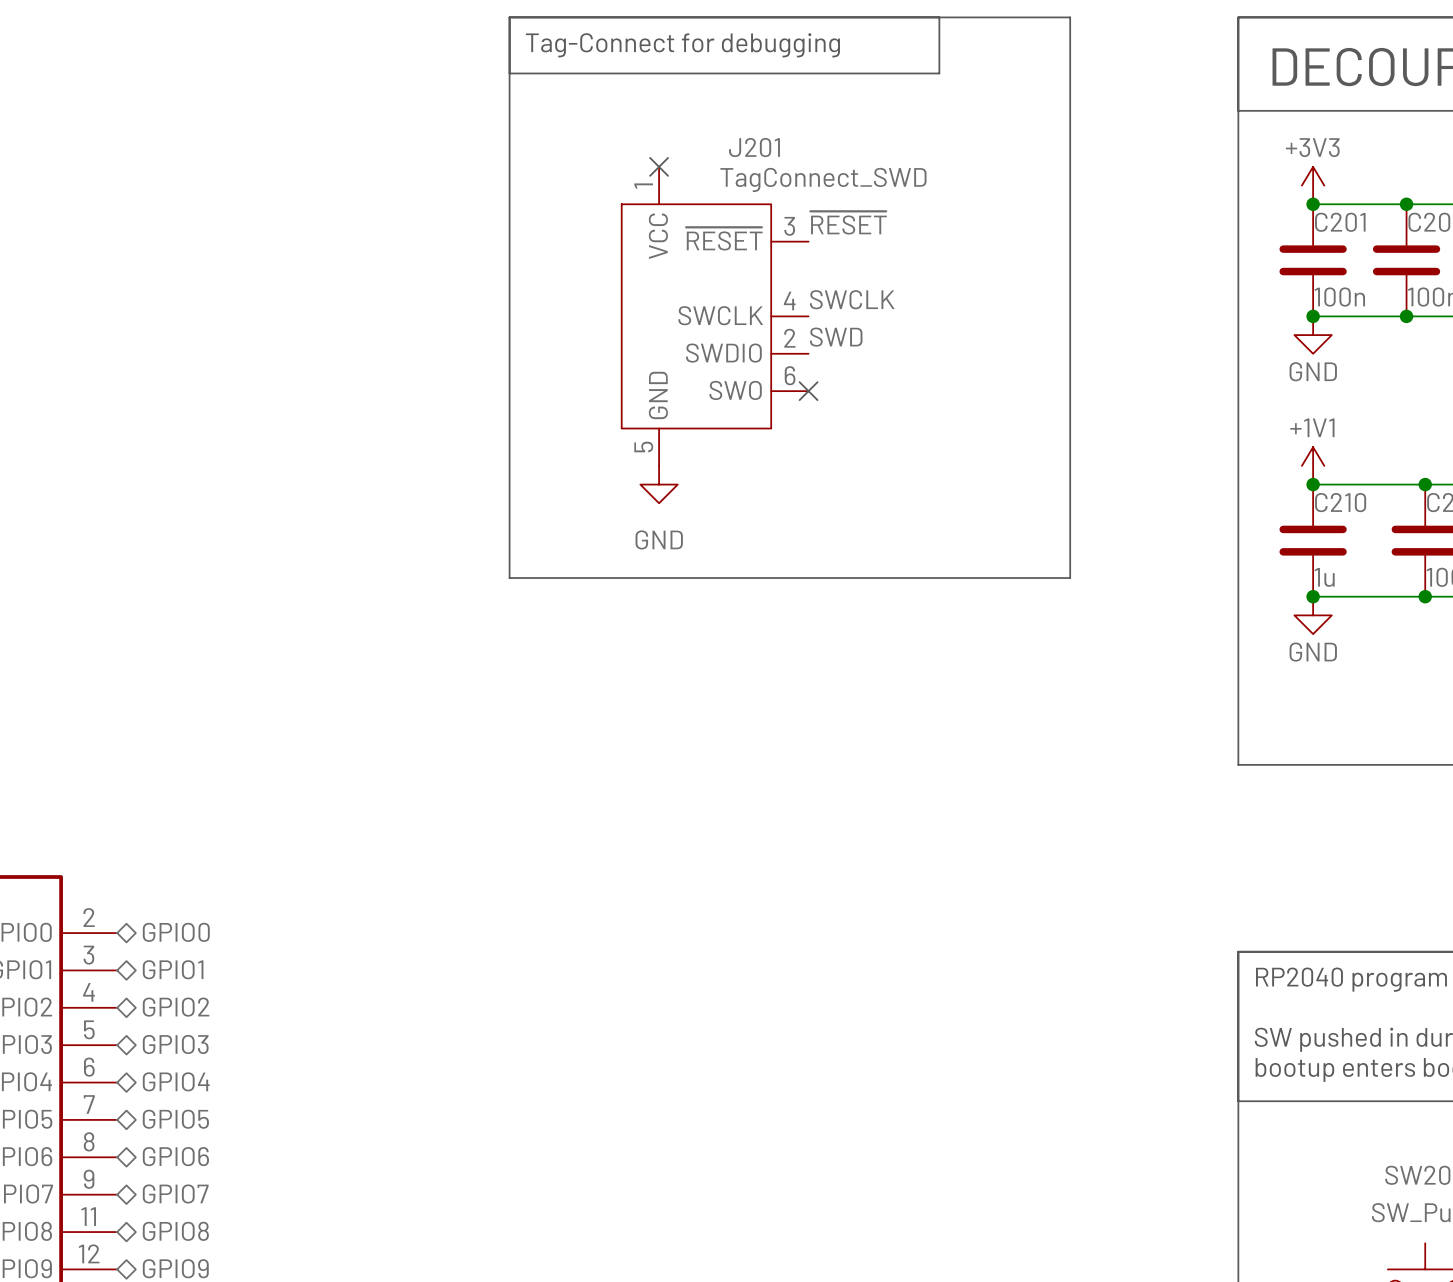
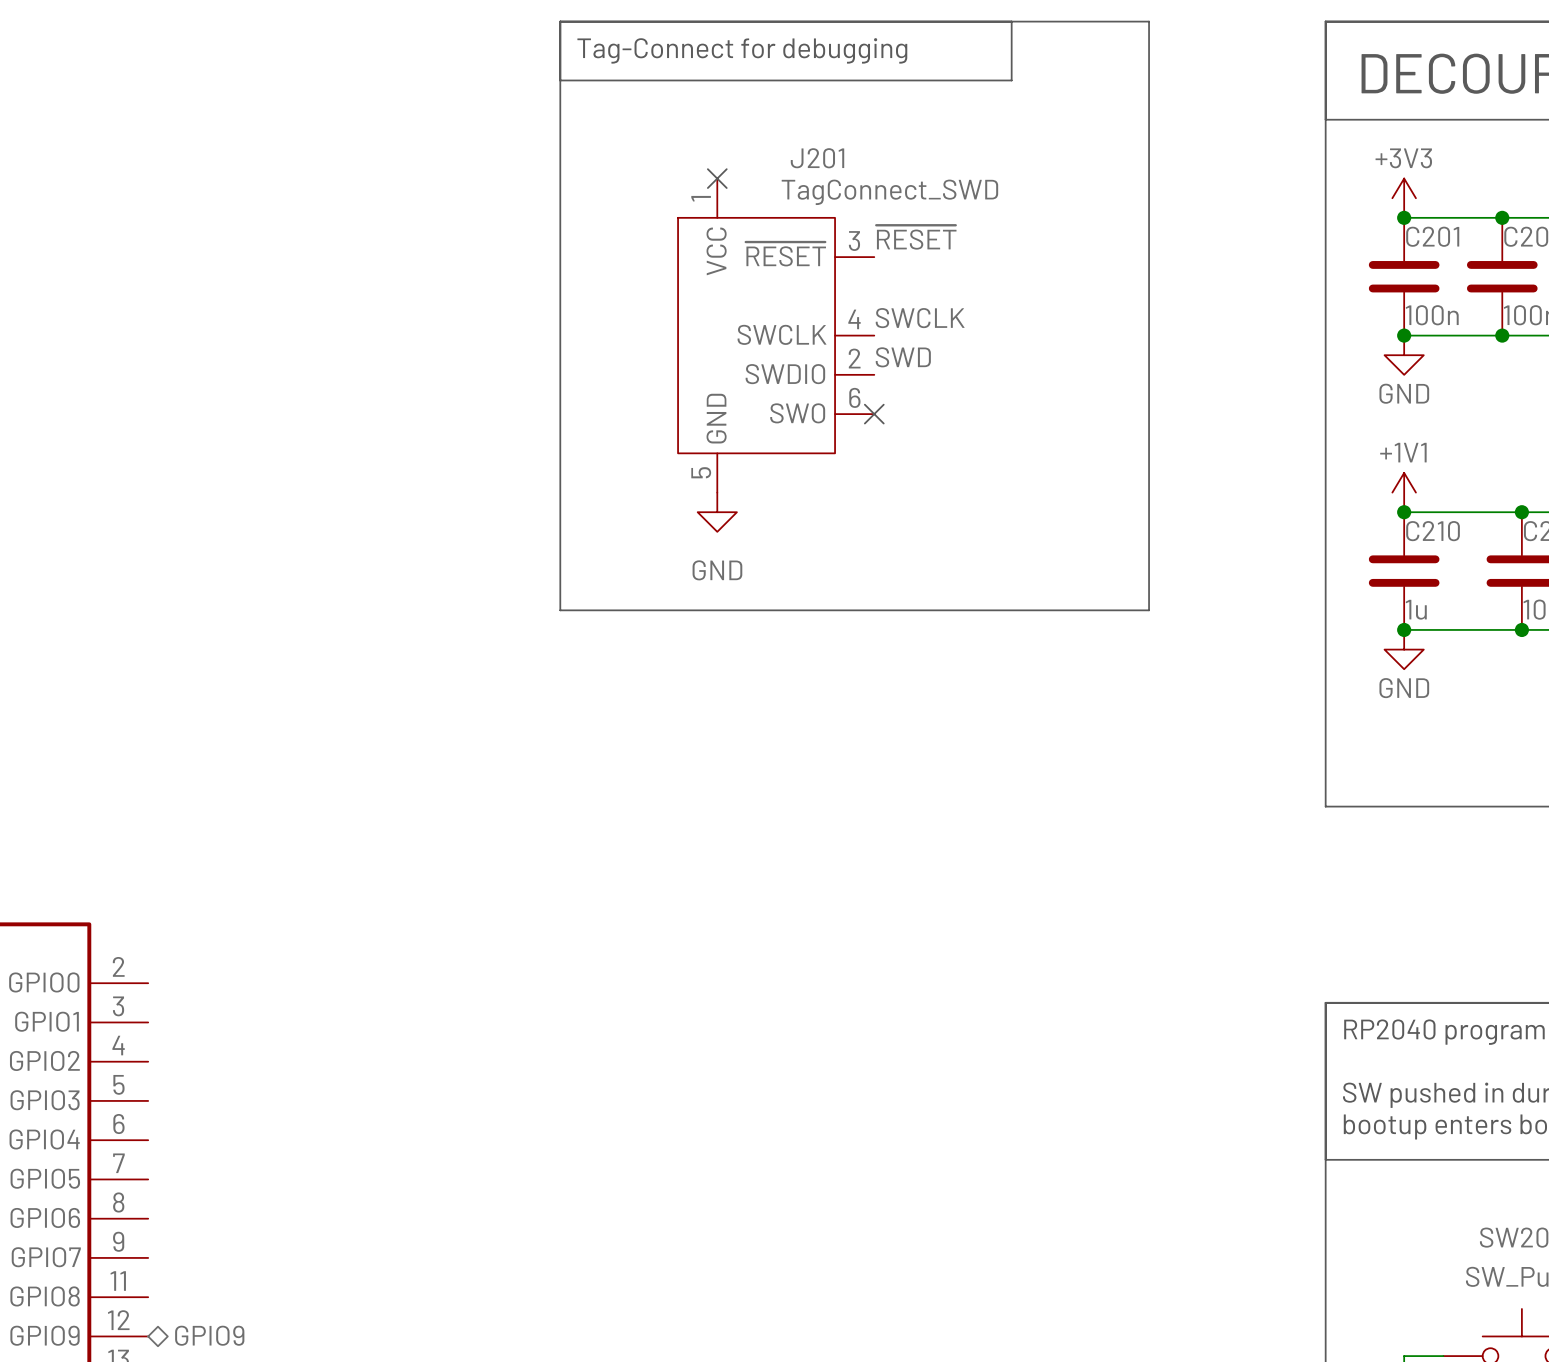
hierarchical label: GPIO0 (176, 932) -> none
hierarchical label: GPIO1 (173, 969) -> none
hierarchical label: GPIO2 (176, 1007) -> none
hierarchical label: GPIO3 (175, 1044) -> none
hierarchical label: GPIO4 (176, 1081) -> none
hierarchical label: GPIO5 (175, 1119) -> none
hierarchical label: GPIO6 (175, 1156) -> none
hierarchical label: GPIO7 (175, 1193) -> none
hierarchical label: GPIO8 (175, 1231) -> none

